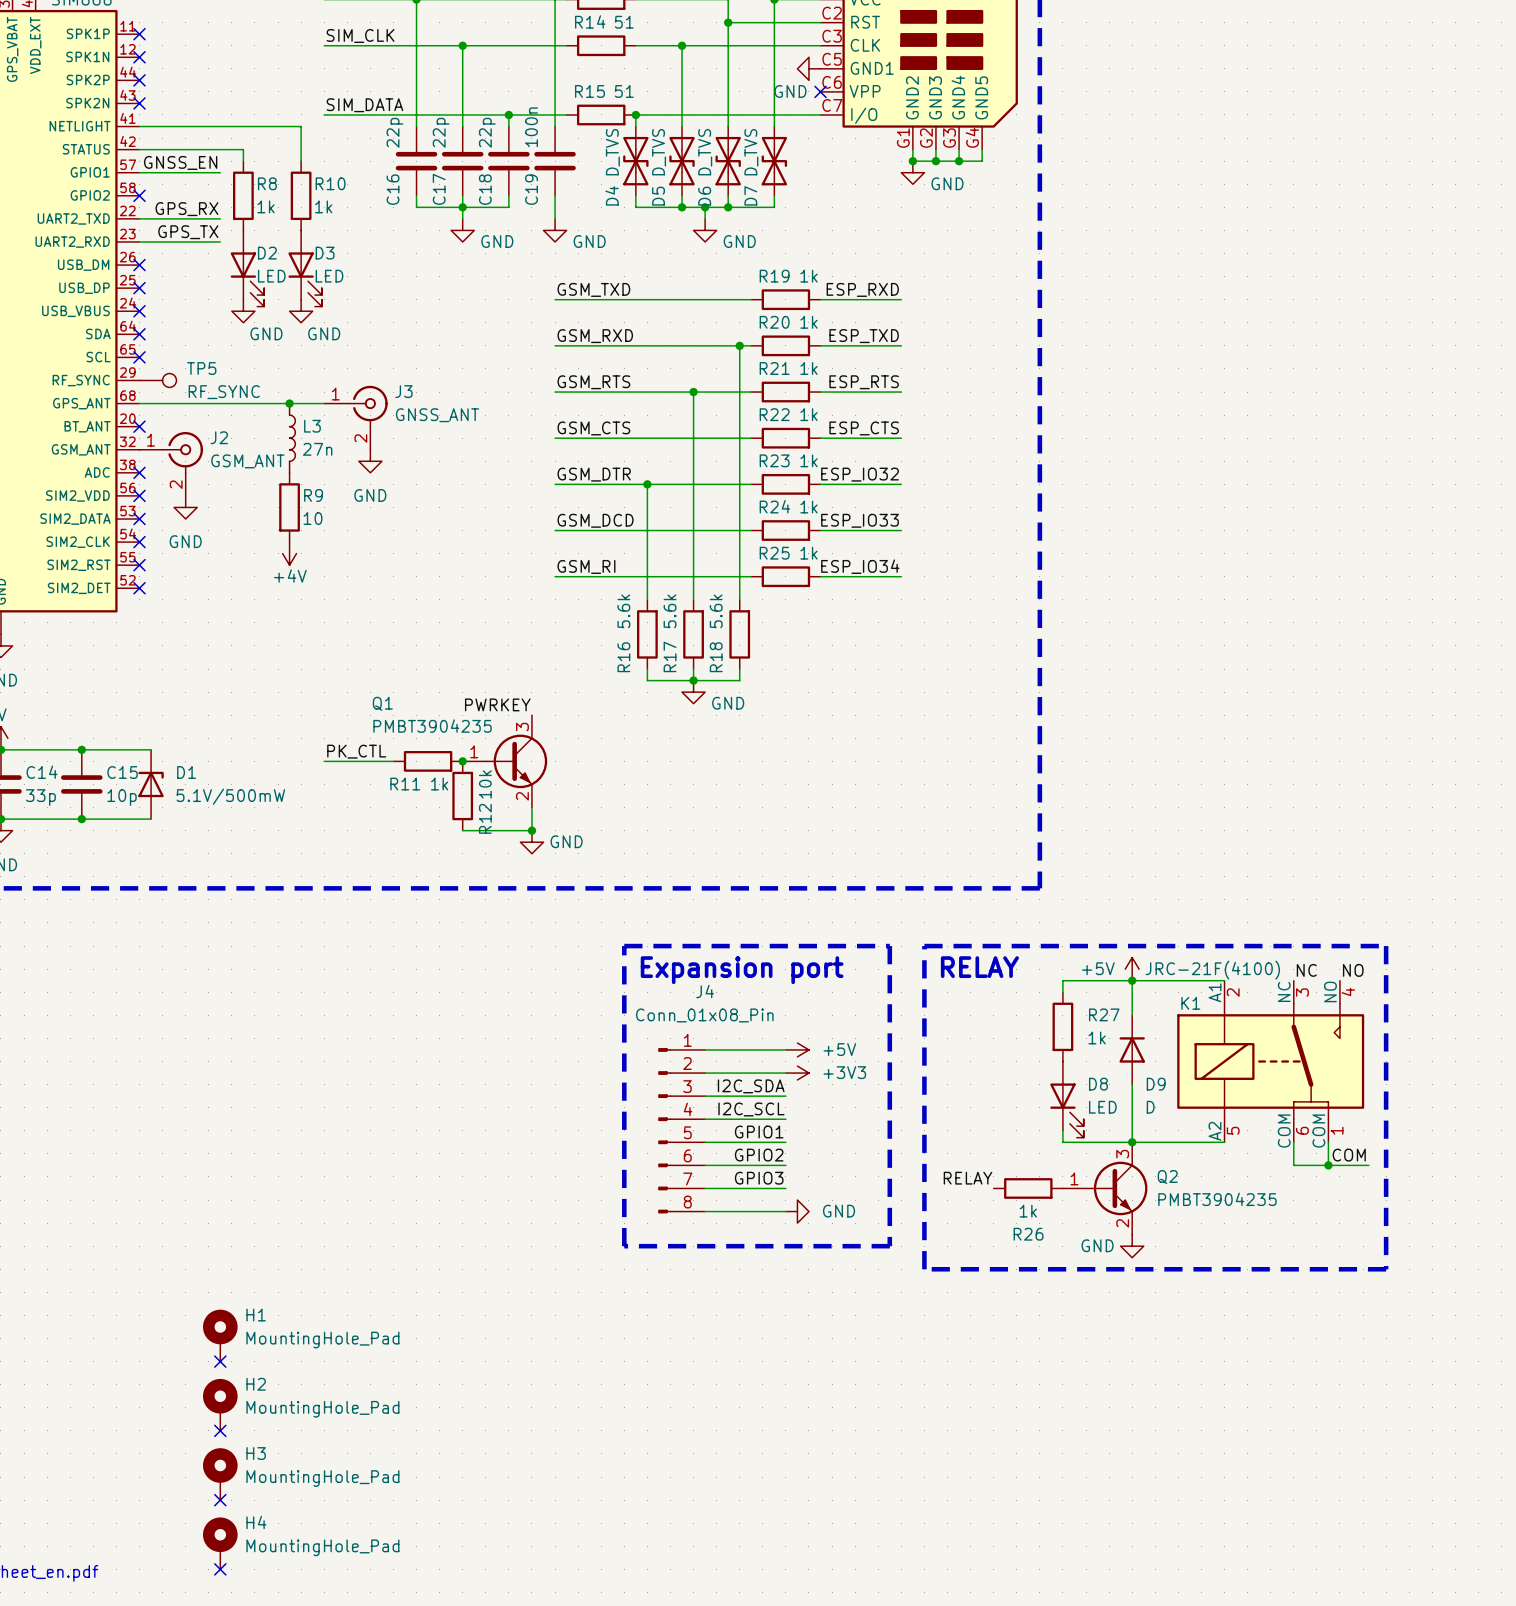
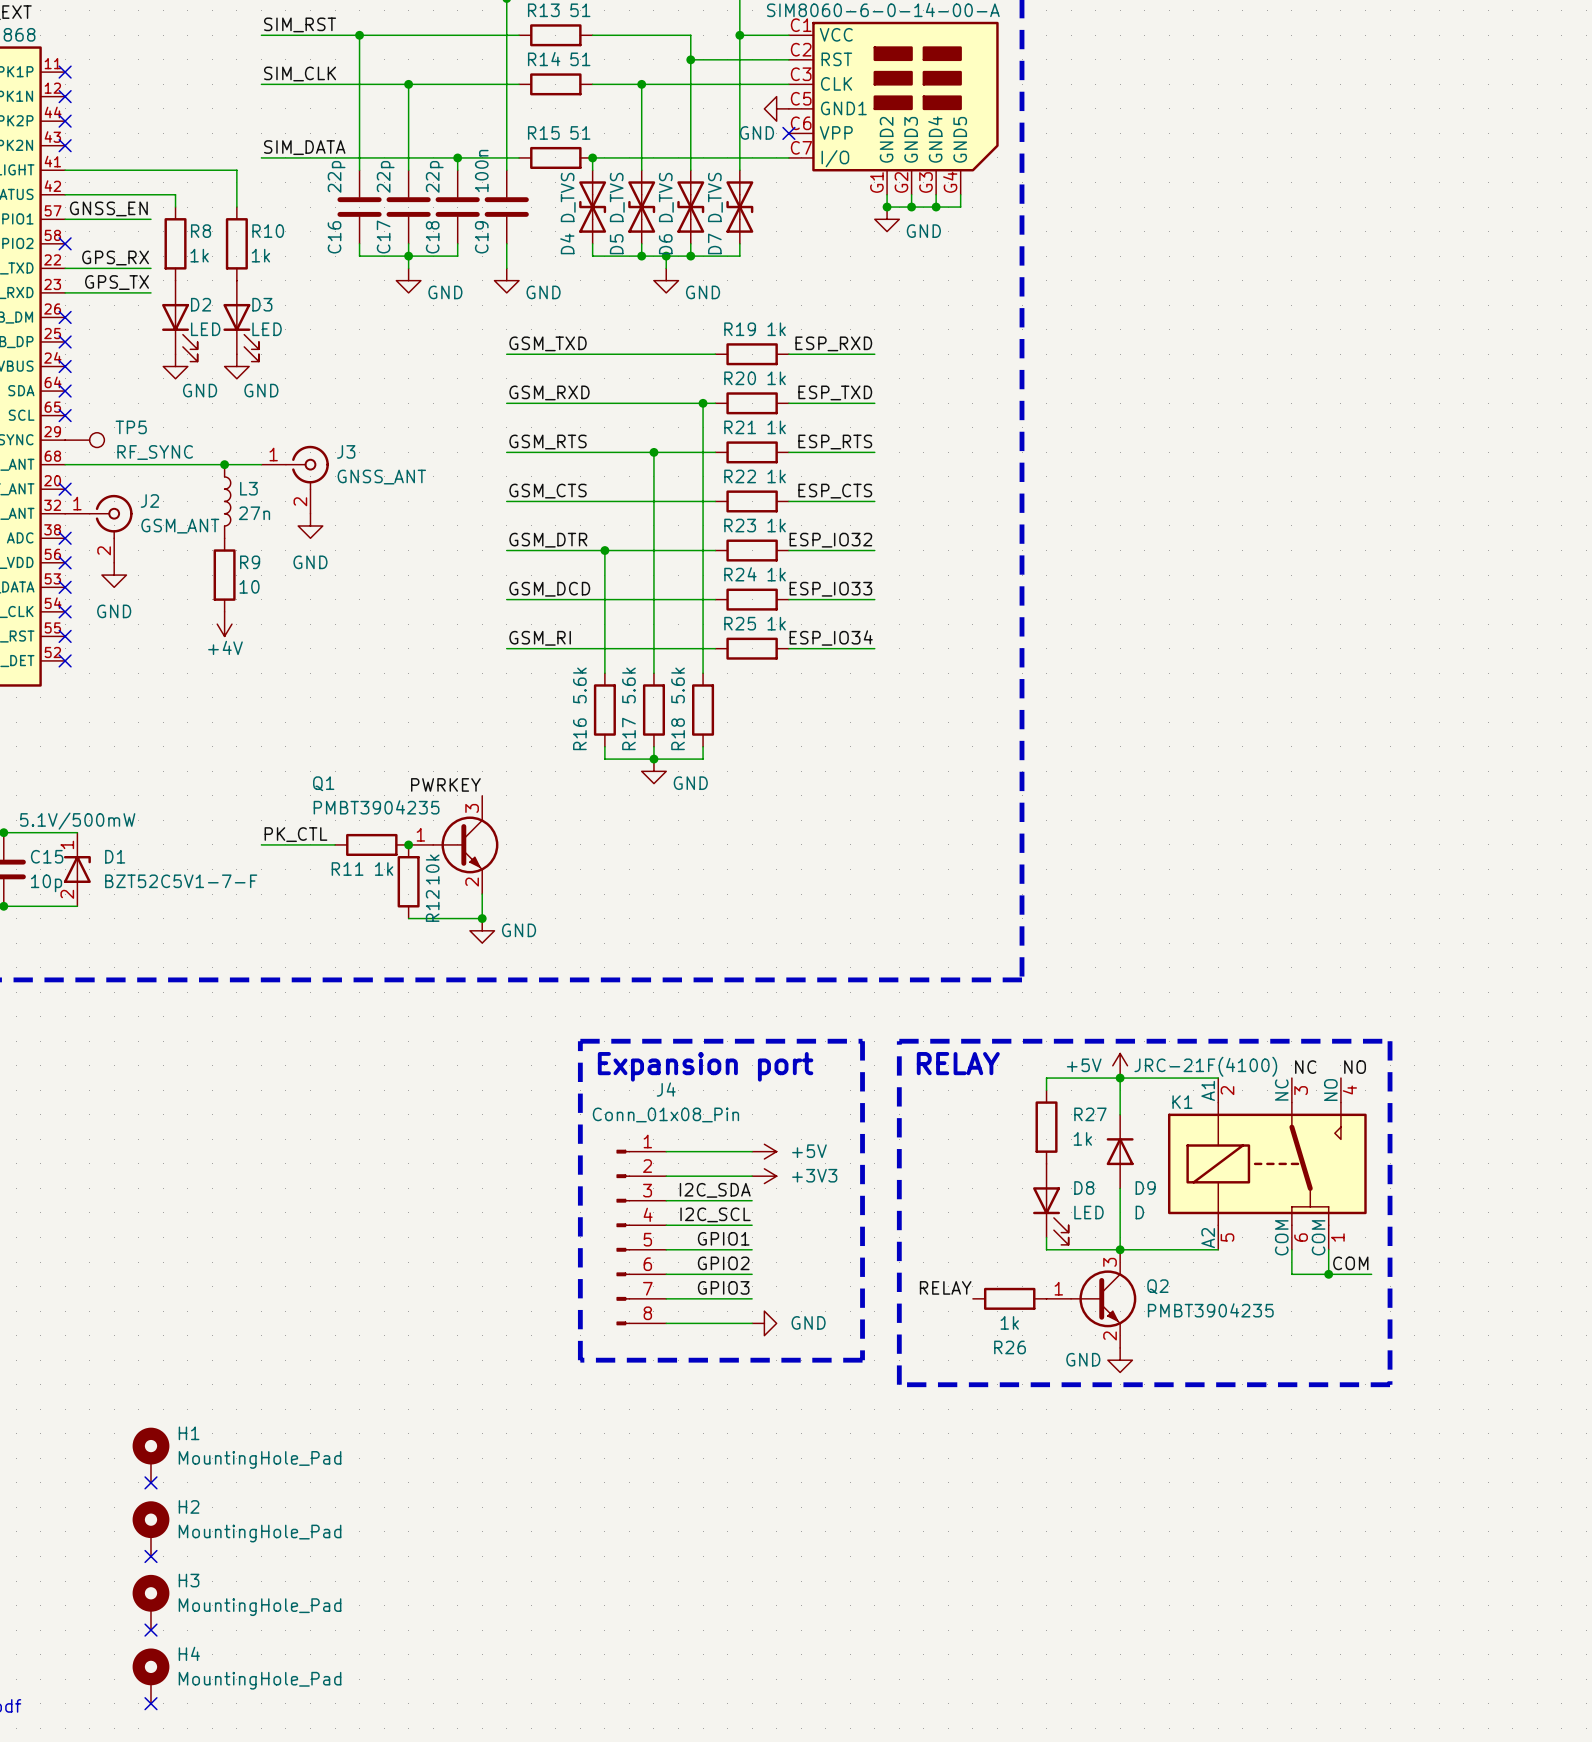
D1 text: none -> 5.1V/500mW (77, 821)
D1 pin number: none -> 1 (67, 844)
D1 value: 5.1V/500mW (230, 796) -> BZT52C5V1-7-F (181, 881)
D1 pin number: none -> 2 (67, 894)

